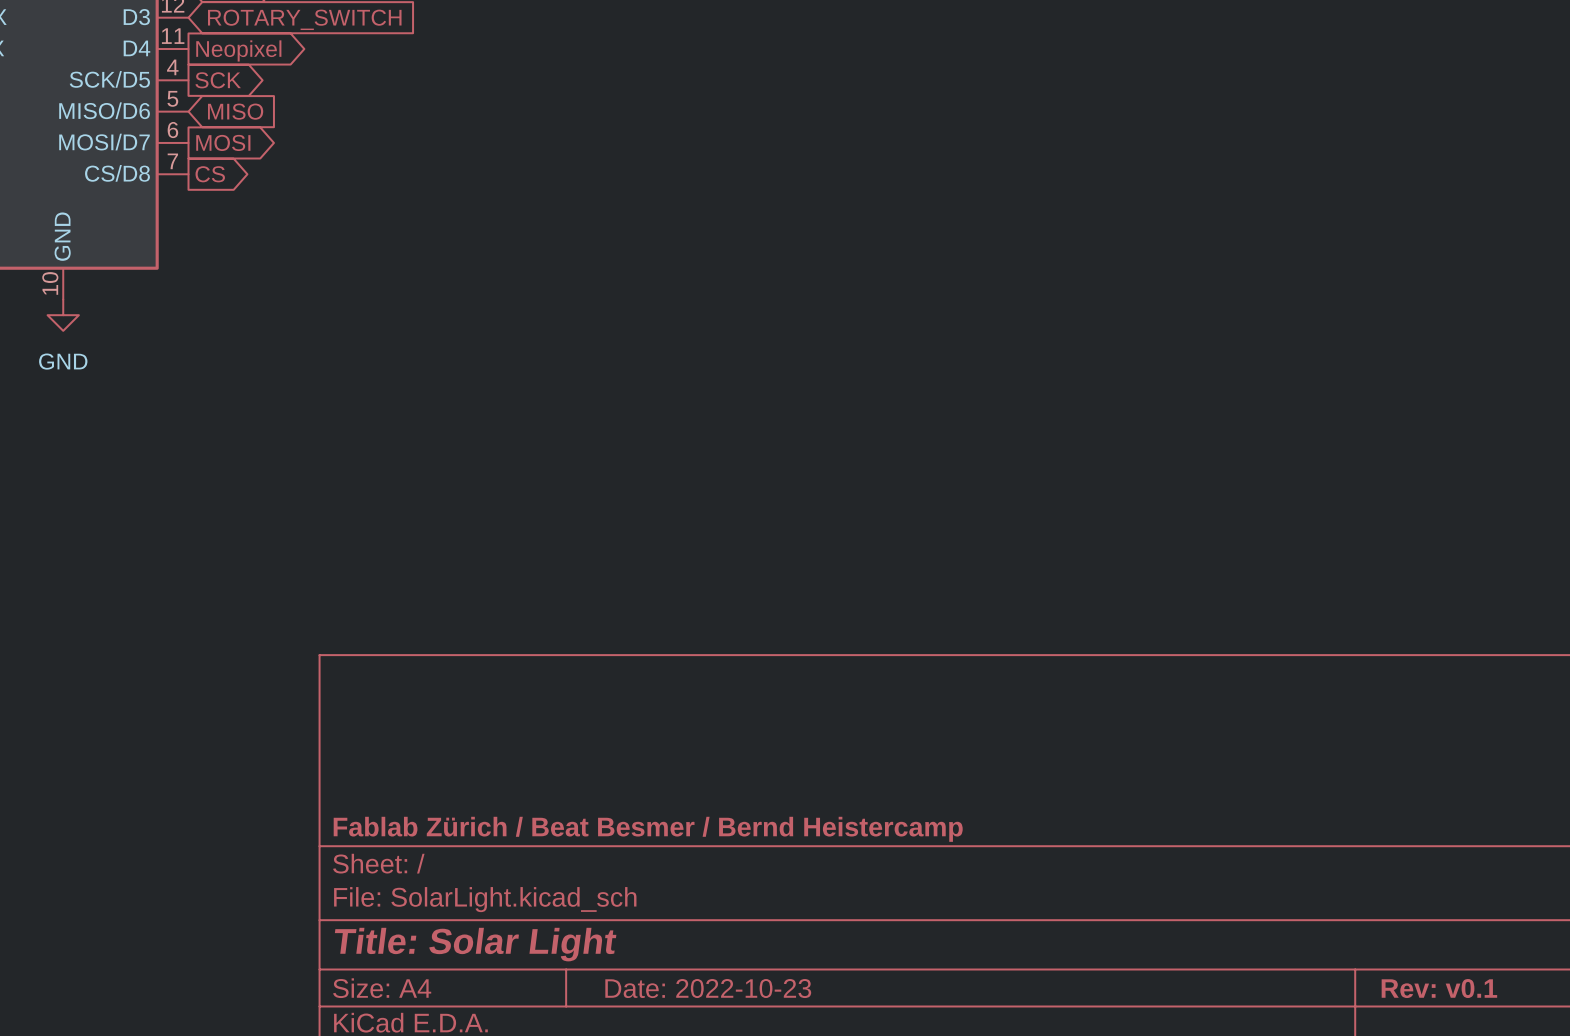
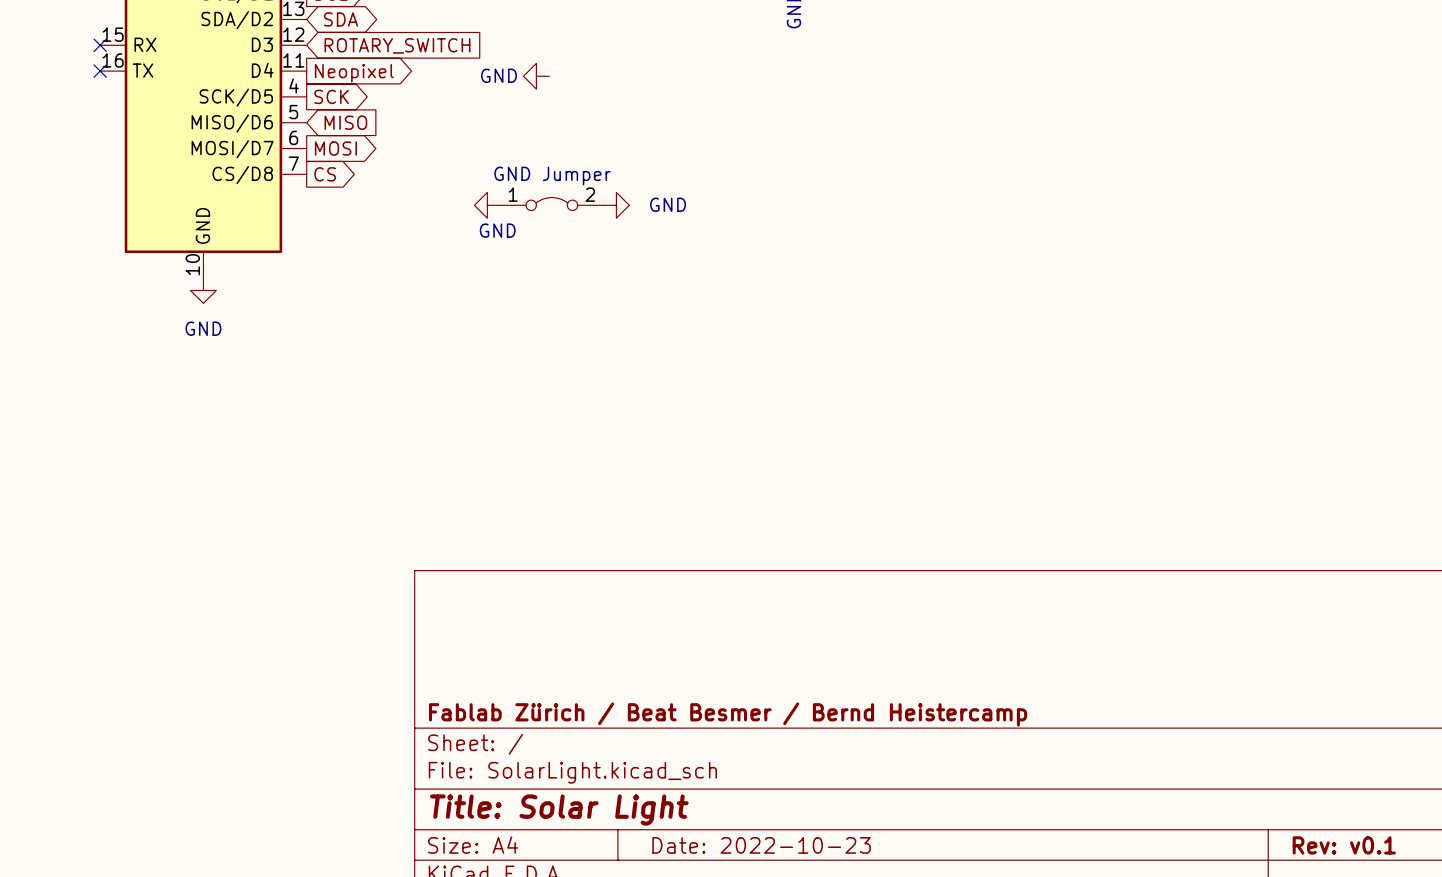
power symbol: none -> GND (536, 76)
part: none -> GND Jumper (551, 204)
power symbol: none -> GND (487, 205)
power symbol: none -> GND (616, 205)

